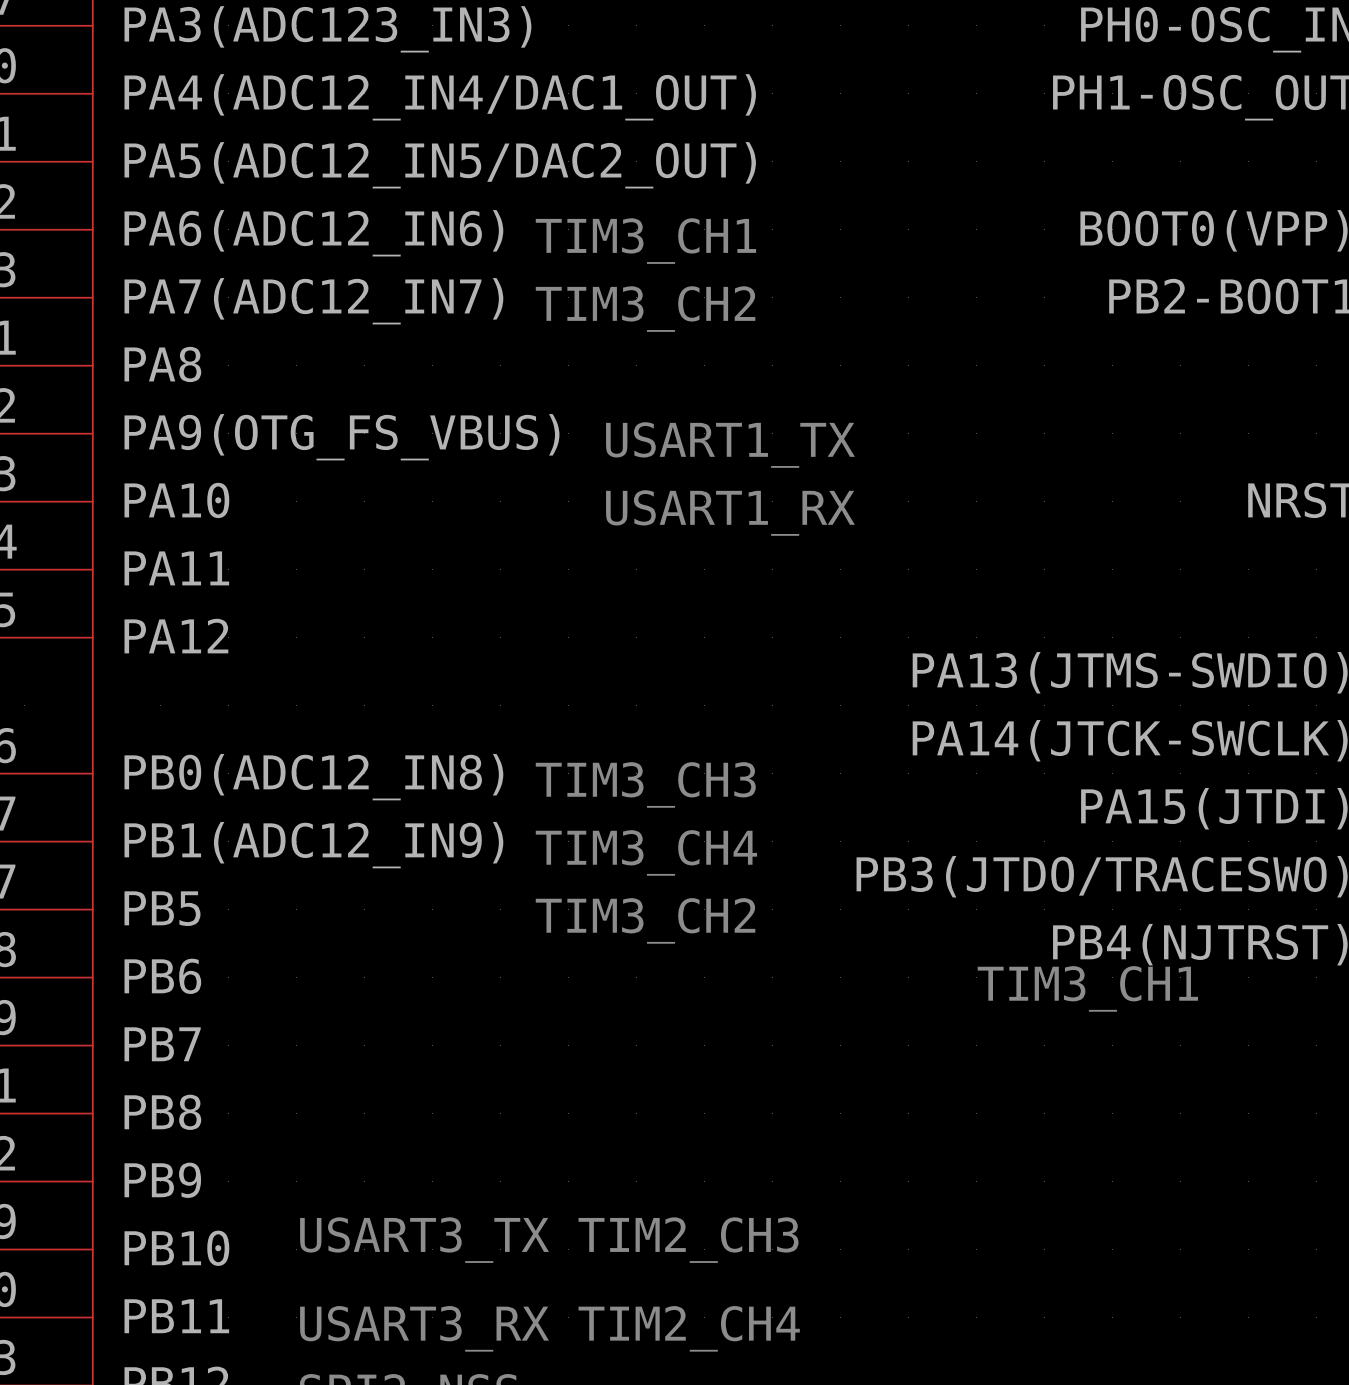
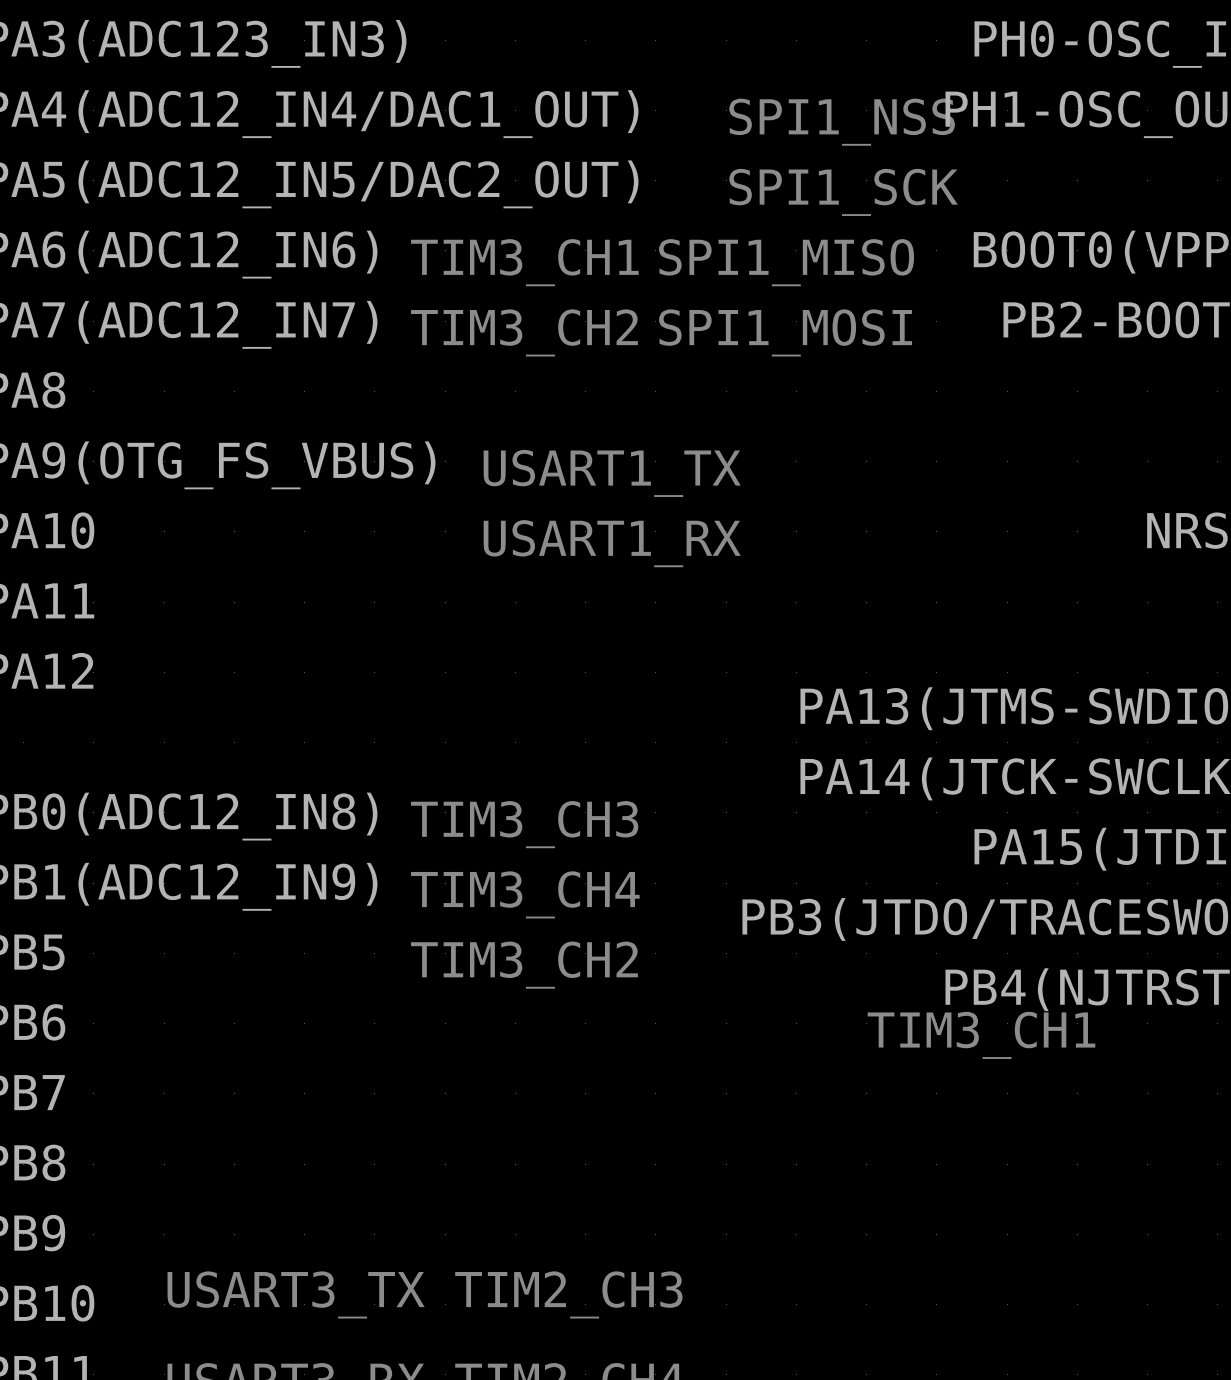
text: none -> SPI1_NSS (842, 122)
text: none -> SPI1_SCK (843, 192)
text: none -> SPI1_MISO (786, 262)
text: none -> SPI1_MOSI (785, 332)

